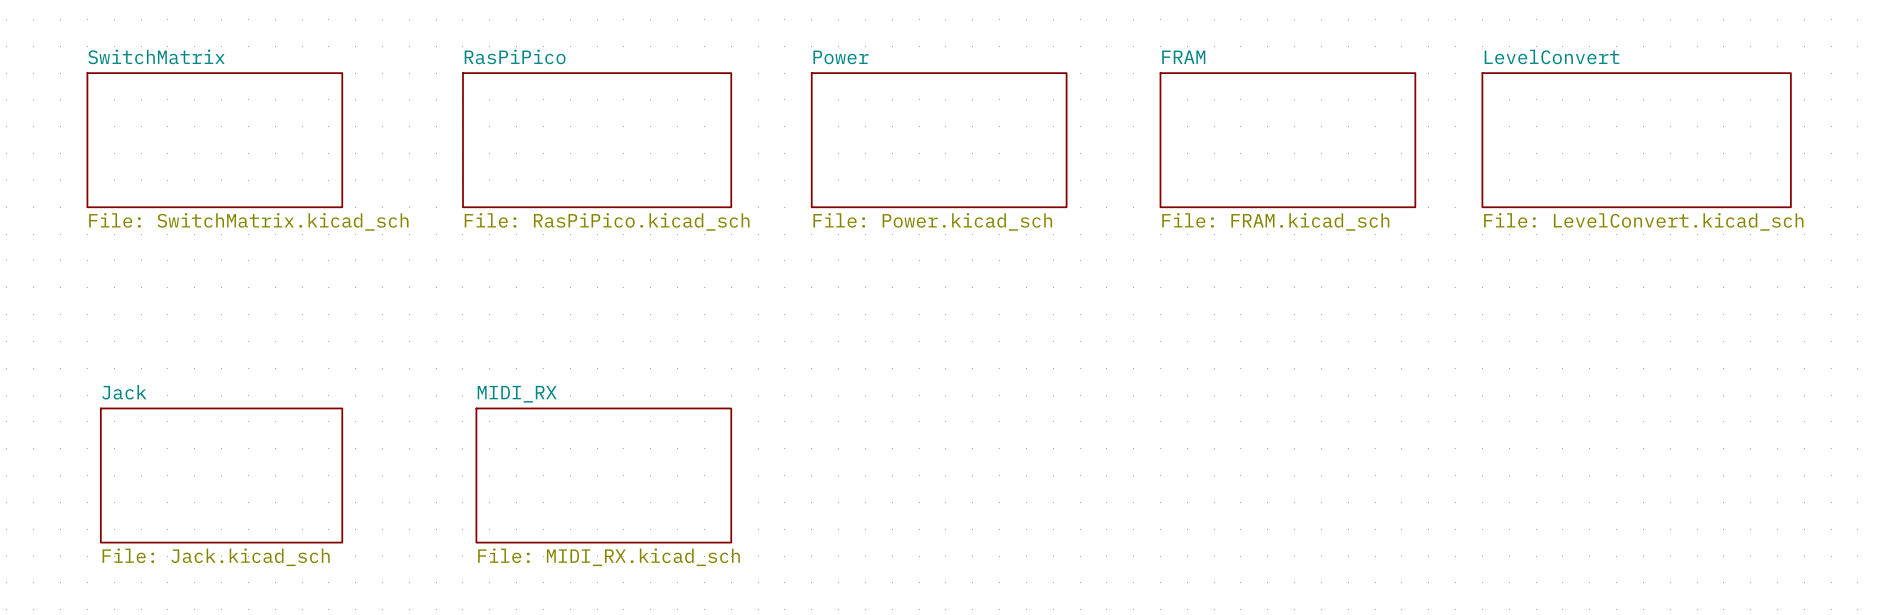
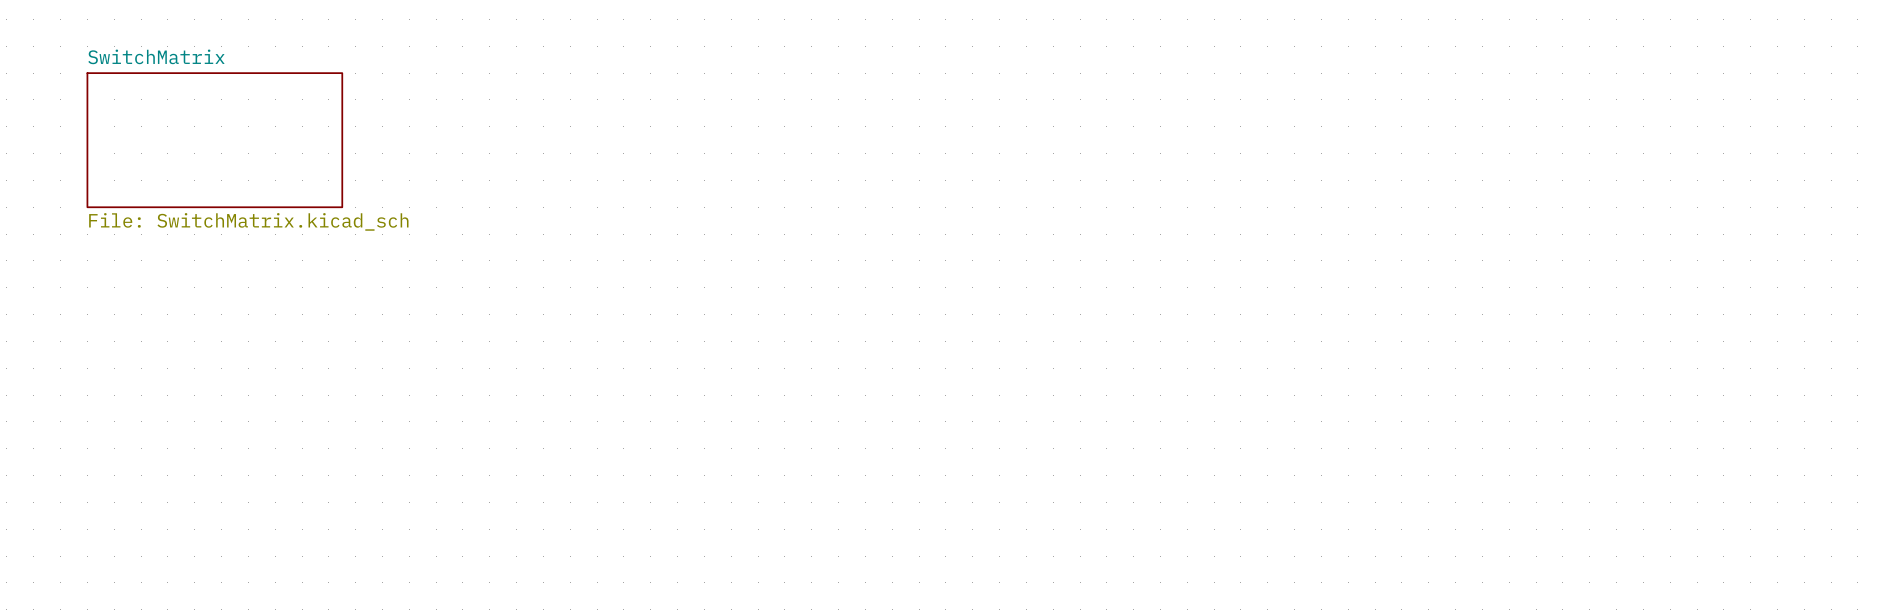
sheet RasPiPico: File: RasPiPico.kicad_sch (597, 140) -> none
sheet Power: File: Power.kicad_sch (939, 140) -> none
sheet FRAM: File: FRAM.kicad_sch (1287, 140) -> none
sheet LevelConvert: File: LevelConvert.kicad_sch (1636, 140) -> none
sheet Jack: File: Jack.kicad_sch (221, 475) -> none
sheet MIDI_RX: File: MIDI_RX.kicad_sch (603, 475) -> none

